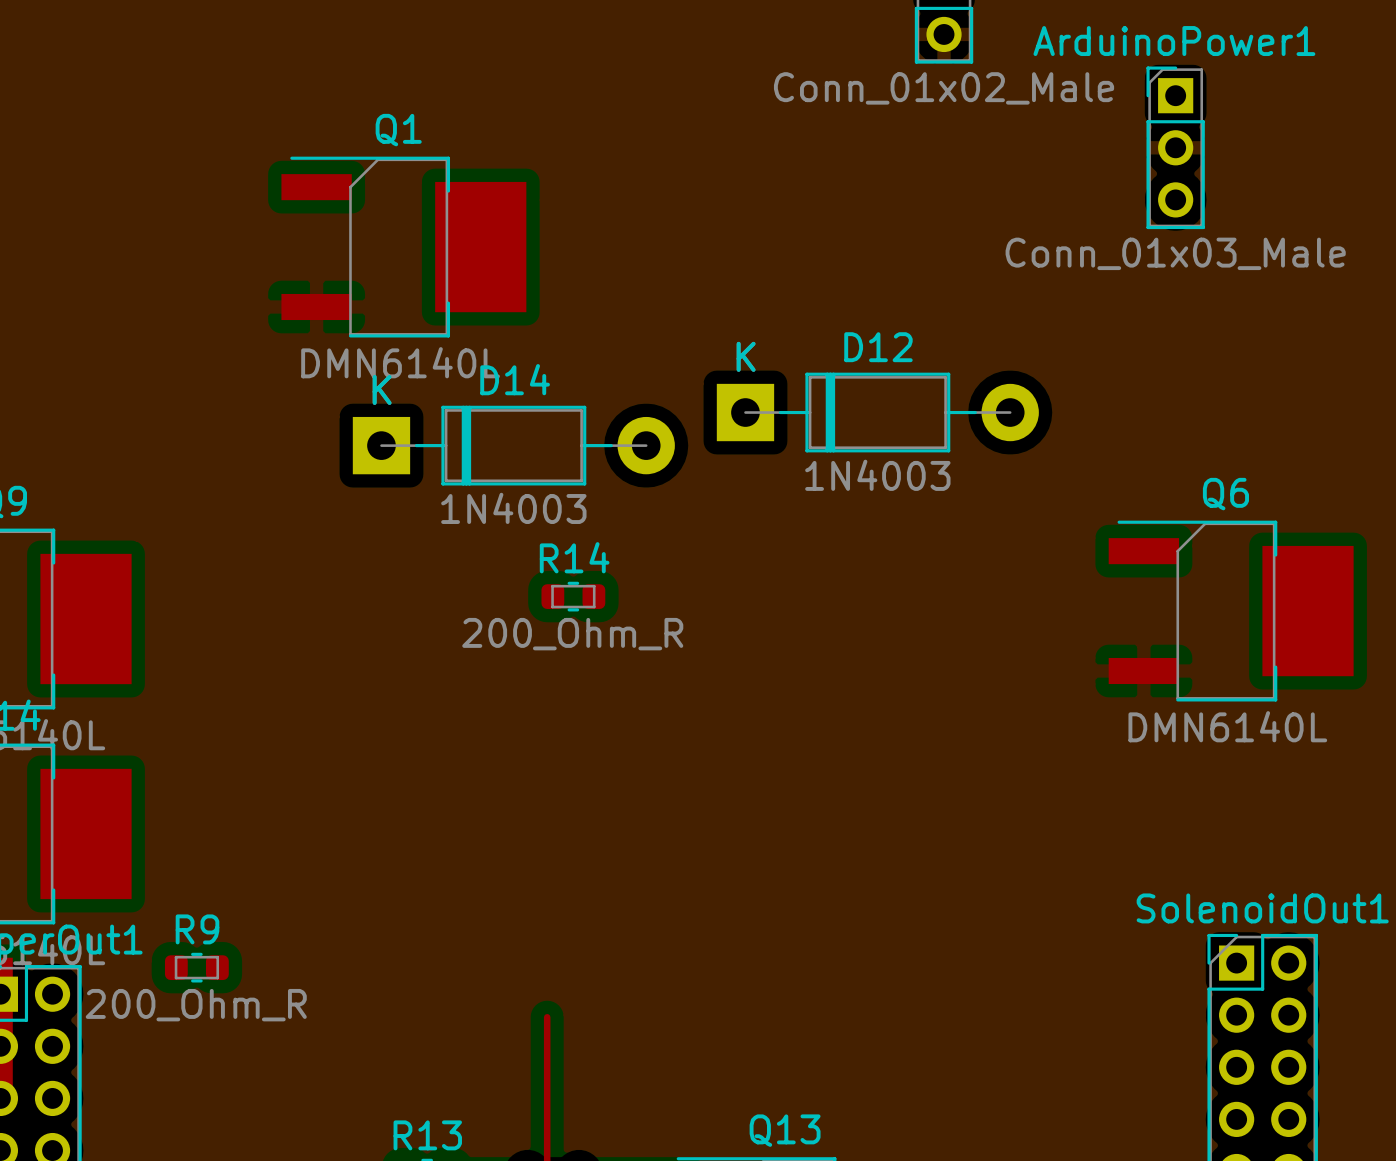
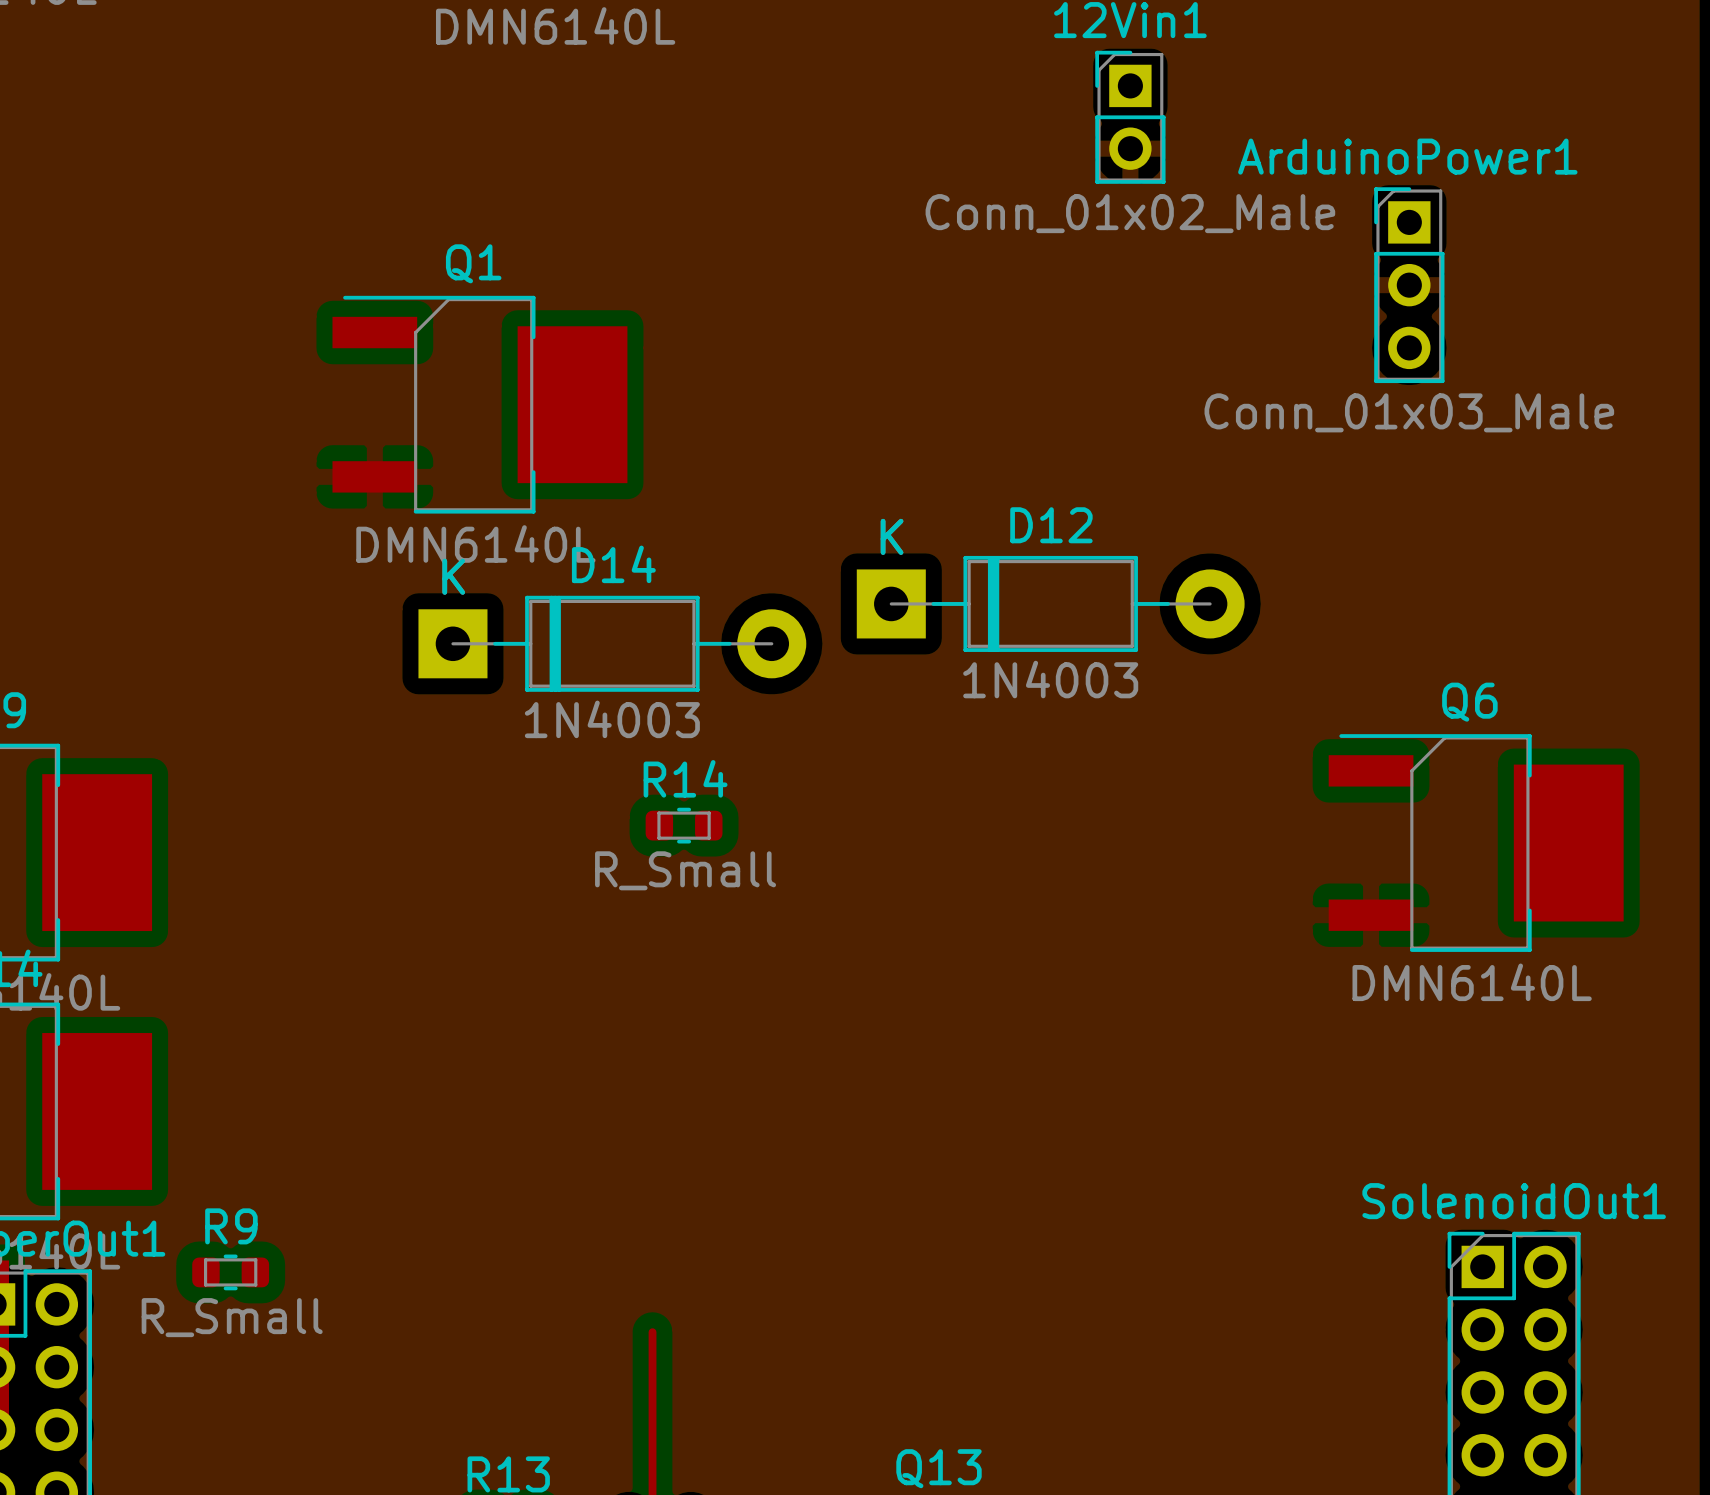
R14 value: 200_Ohm_R (572, 634) -> R_Small (685, 870)
R9 value: 200_Ohm_R (196, 1005) -> R_Small (232, 1317)

